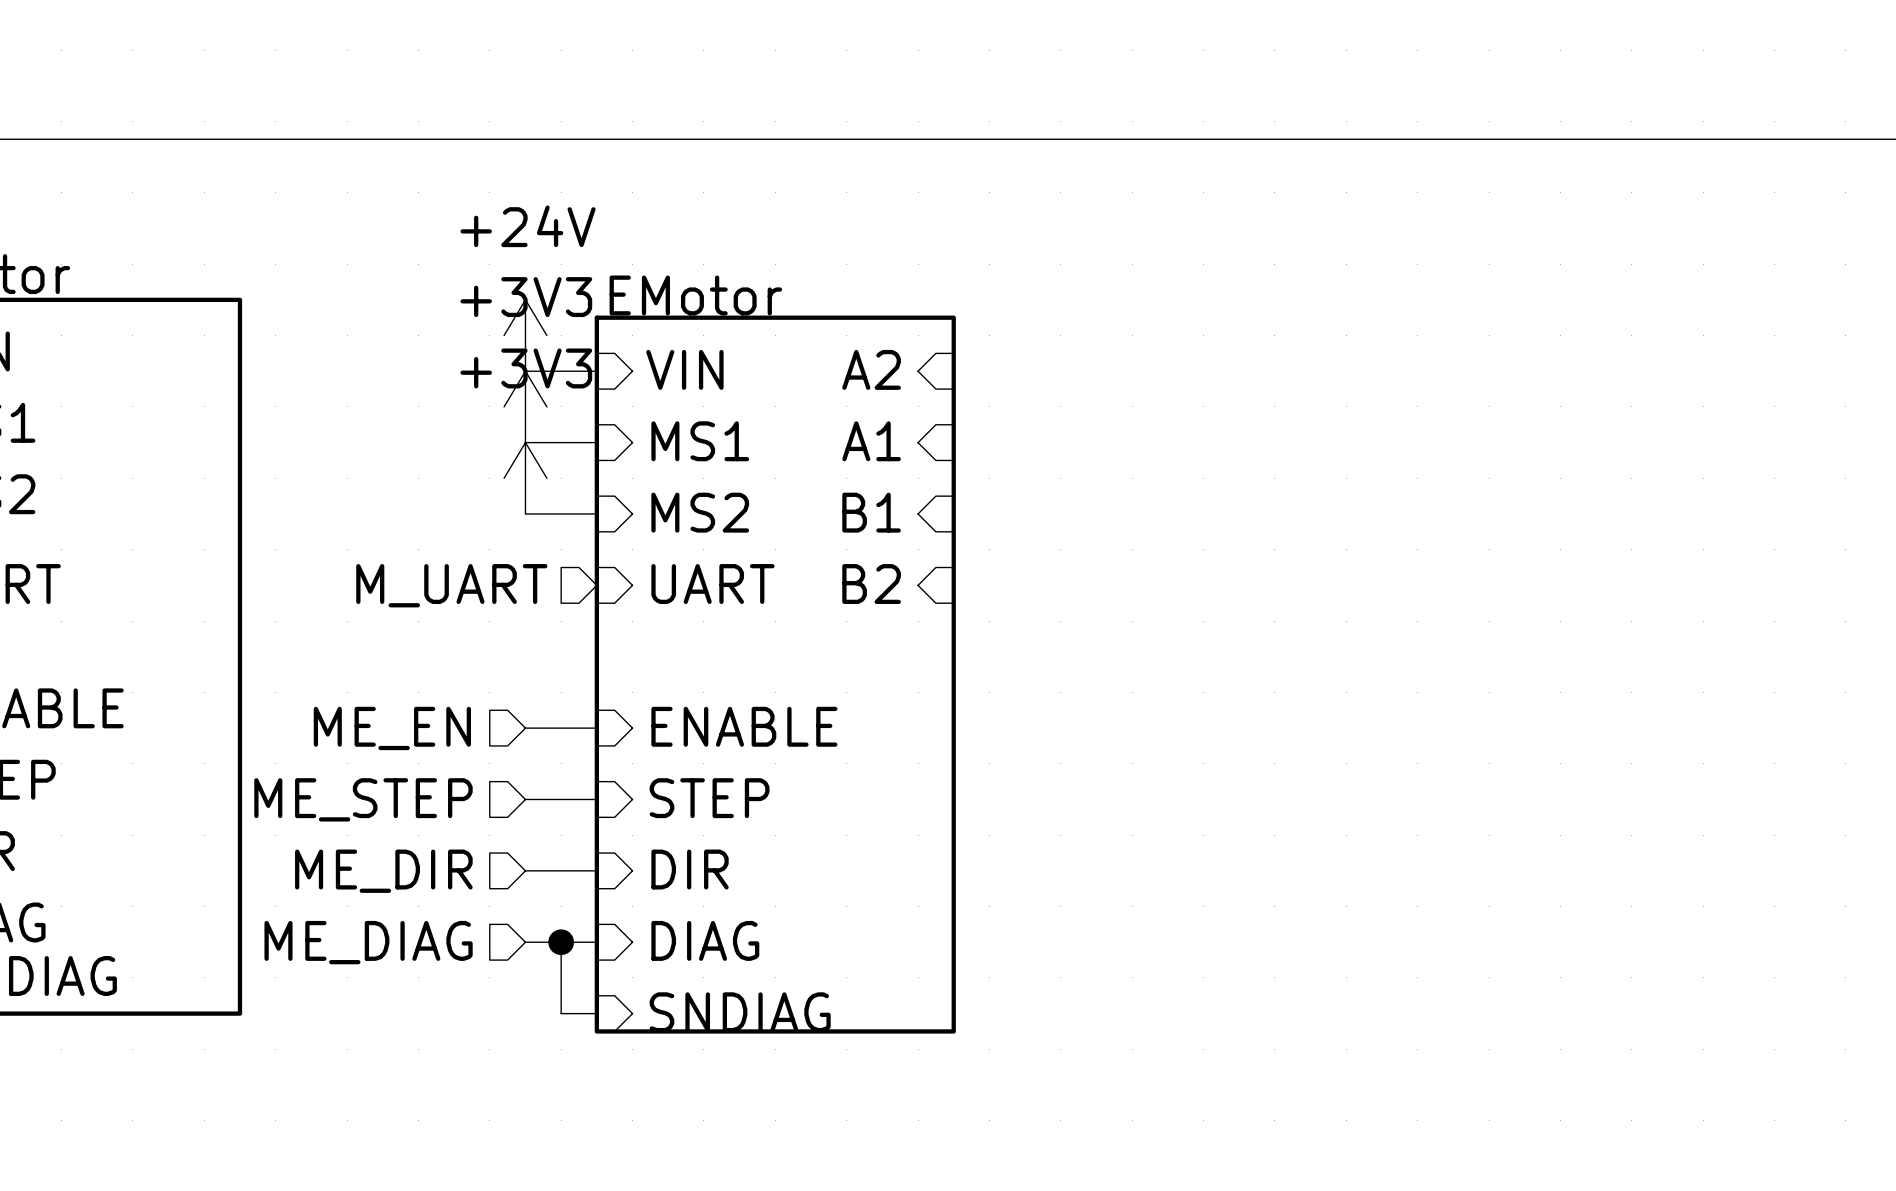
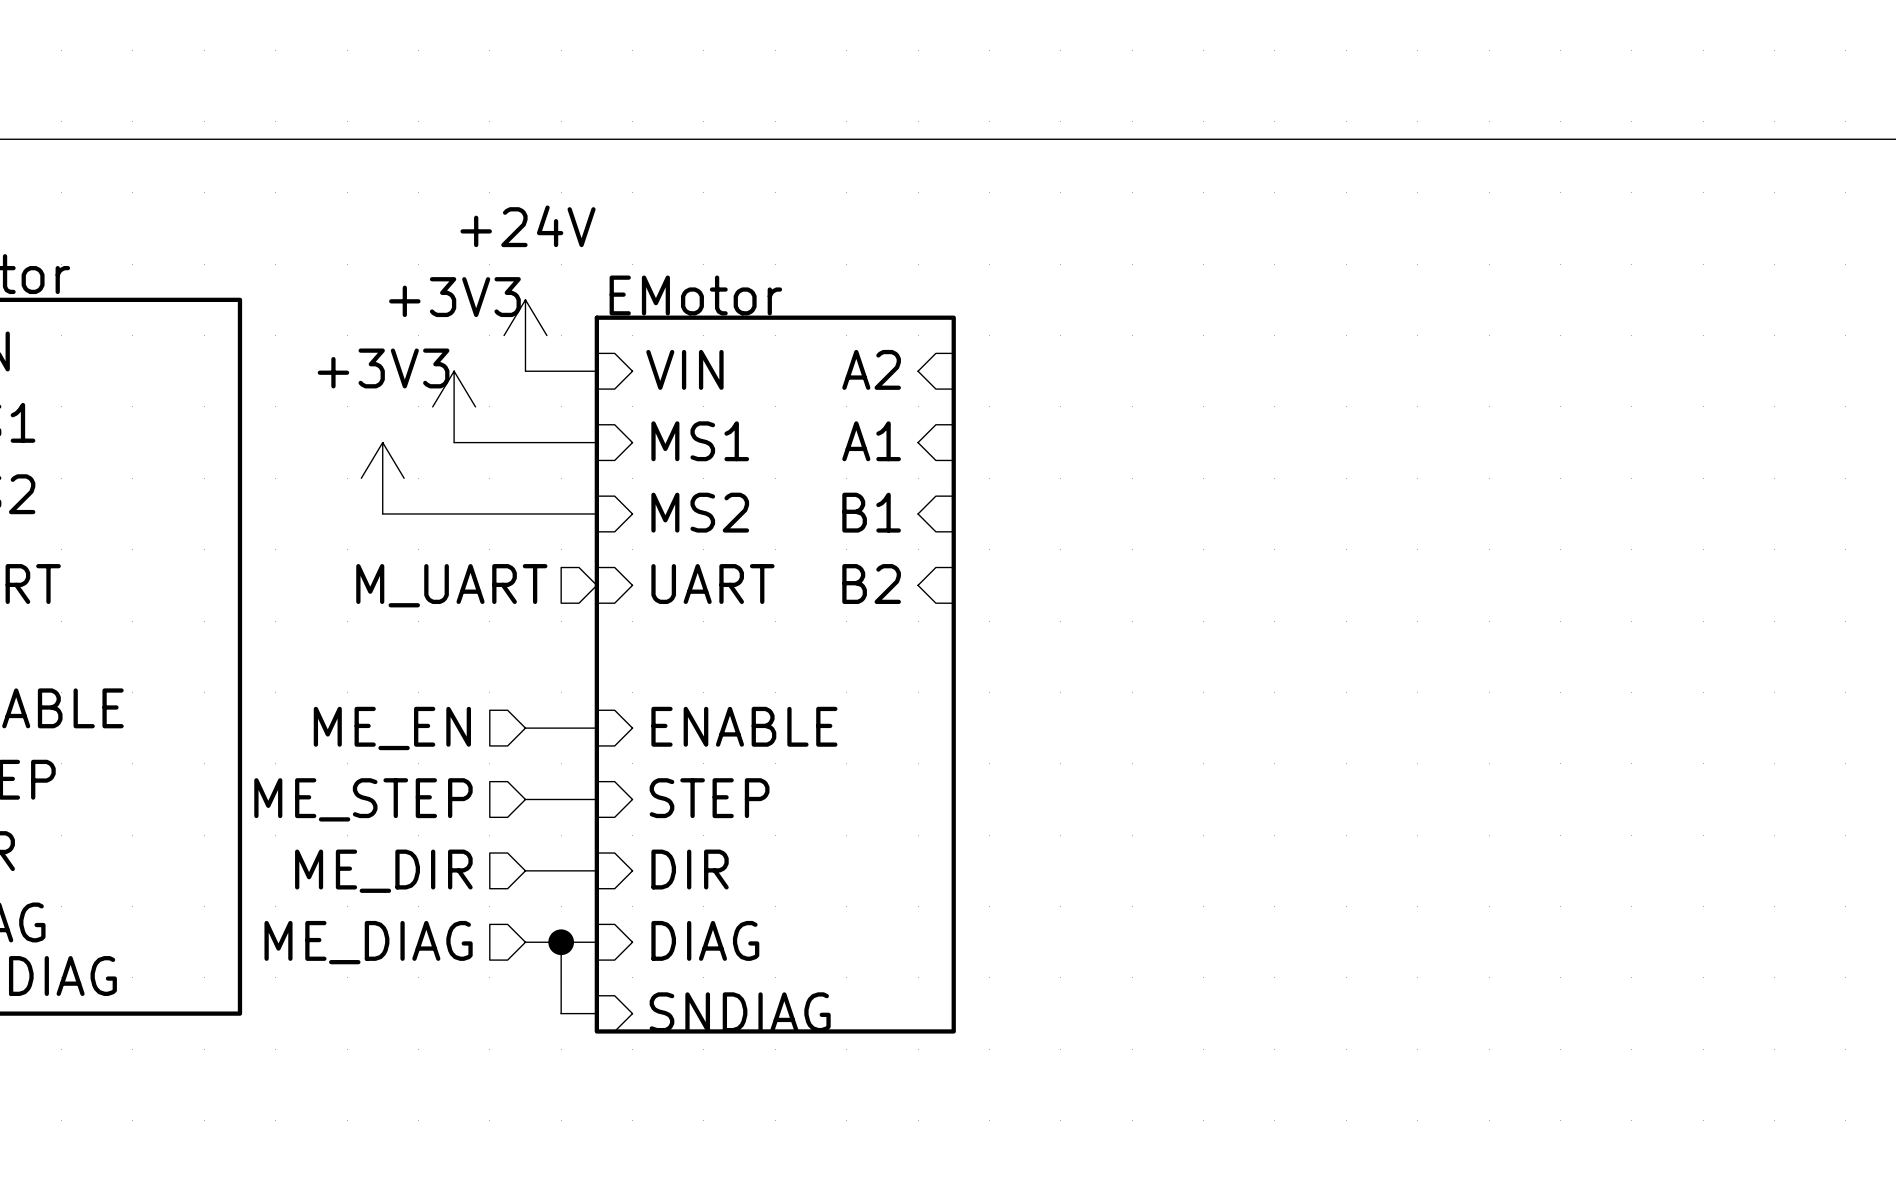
power symbol: none -> +3V3 (454, 406)
power symbol: +3V3 (525, 406) -> none
wire: none -> (454, 442) (525, 442)
power symbol: none -> +3V3 (382, 478)
power symbol: +3V3 (525, 478) -> none
wire: none -> (382, 513) (525, 513)

